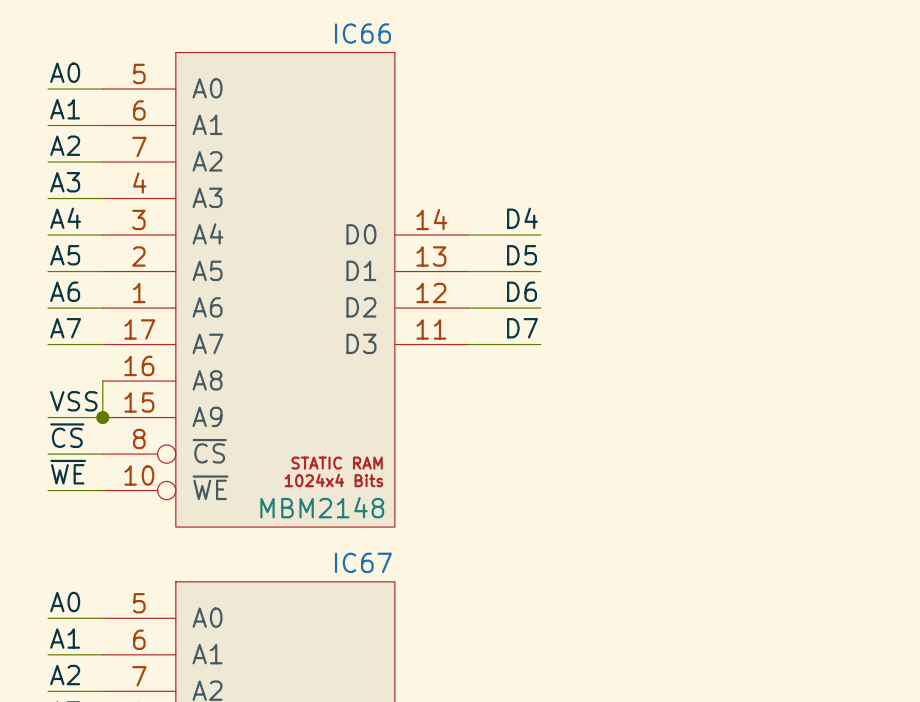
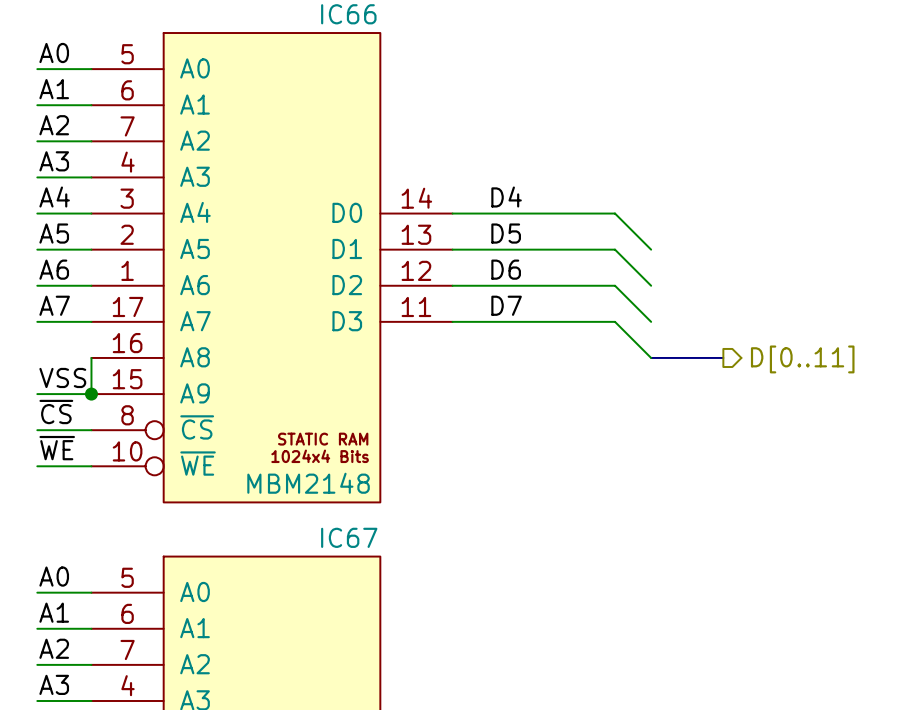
wire: none -> (524, 213) (615, 213) (651, 249)
wire: none -> (524, 249) (615, 249) (651, 285)
wire: none -> (524, 285) (615, 285) (651, 321)
wire: none -> (524, 321) (615, 321) (651, 357)
bus: none -> (651, 357) (723, 357)
hierarchical label: none -> D[0..11] (802, 359)

